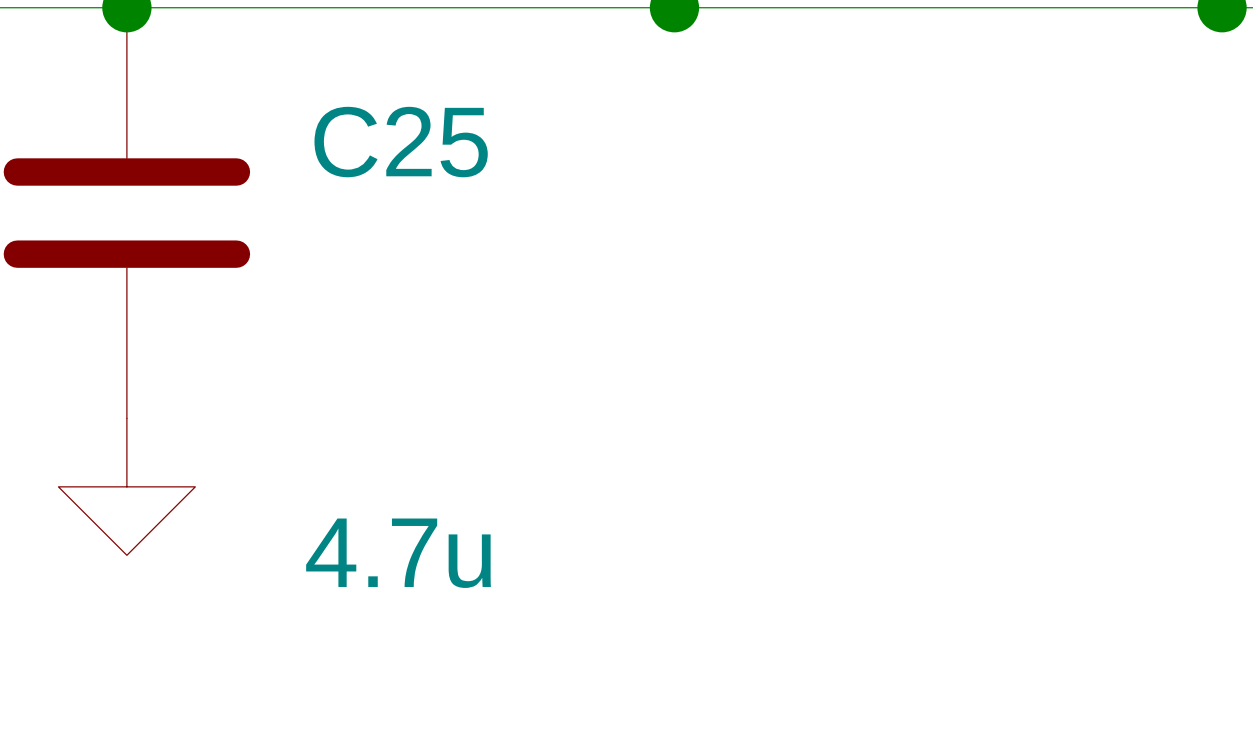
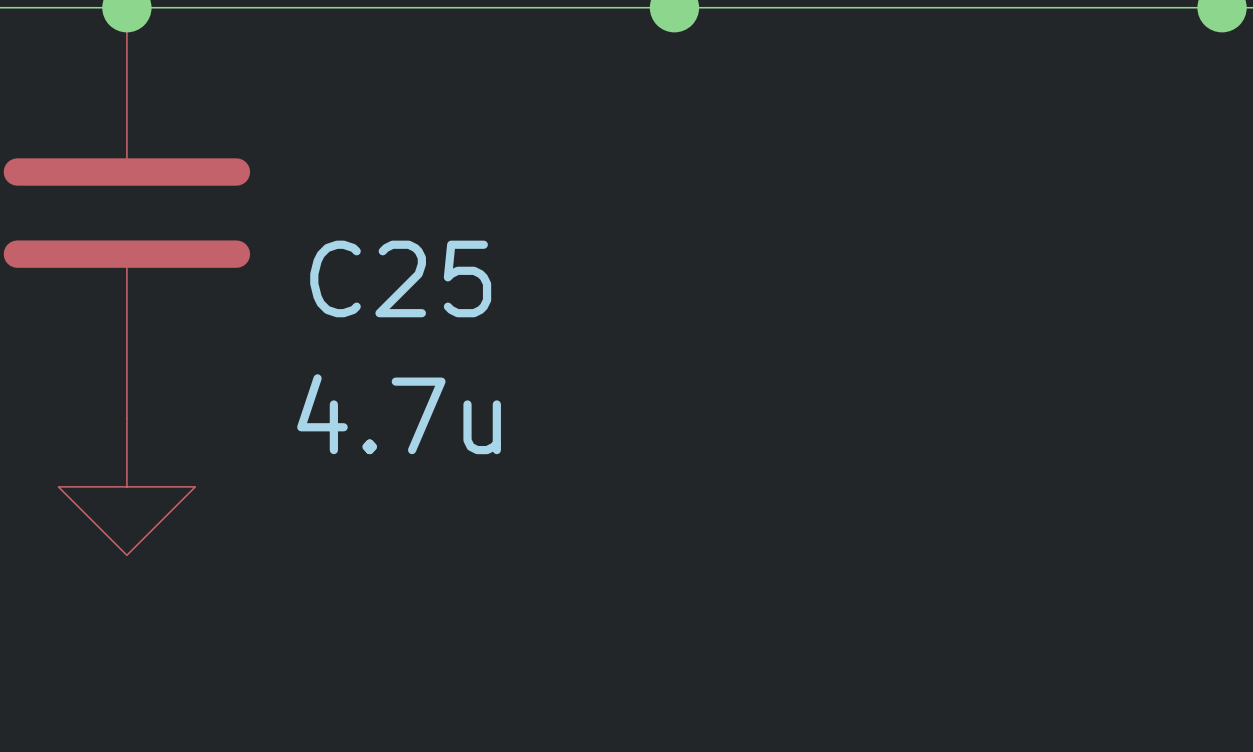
C25 name position: C25 (401, 142) -> C25 (400, 278)
C25 value position: 4.7u (398, 553) -> 4.7u (399, 414)

